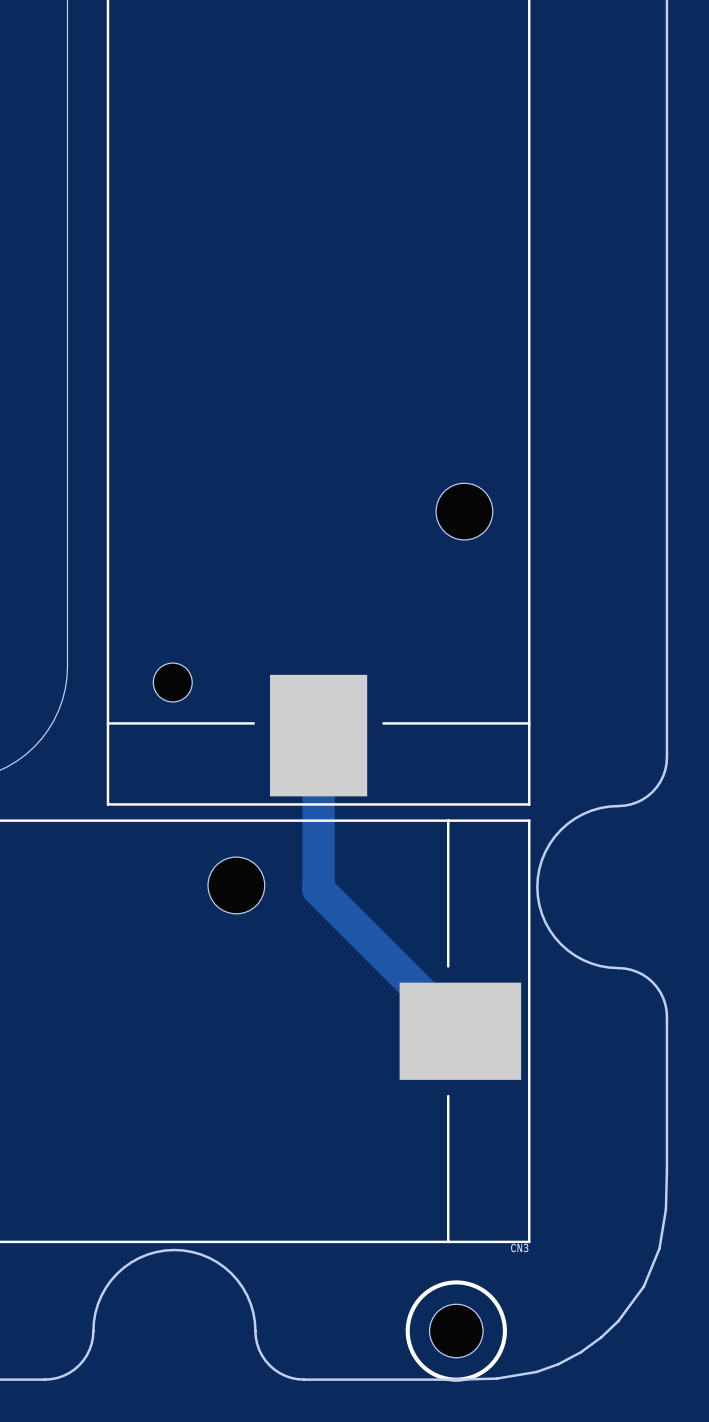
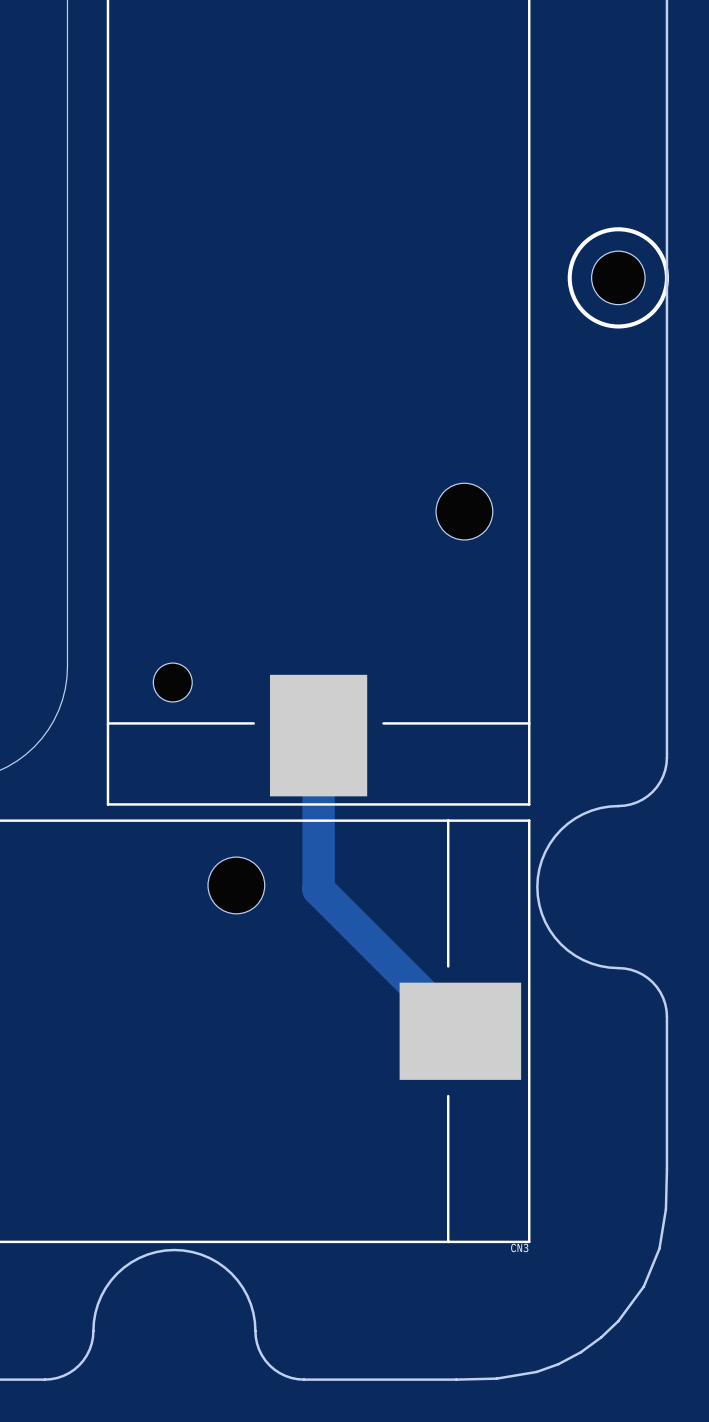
part: none -> (618, 277)
part: (456, 1331) -> none

